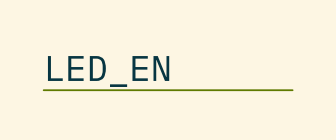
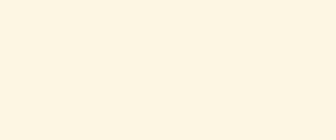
label: LED_EN (108, 71) -> none
wire: (43, 90) (292, 90) -> none

